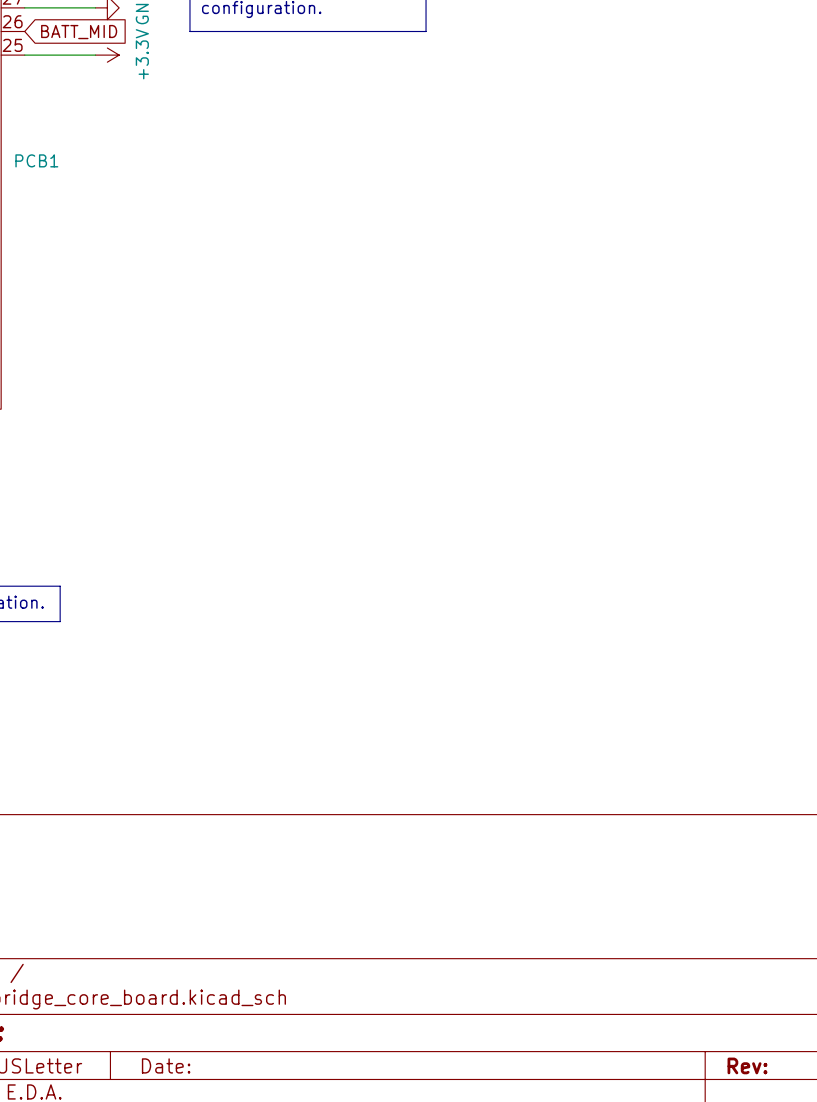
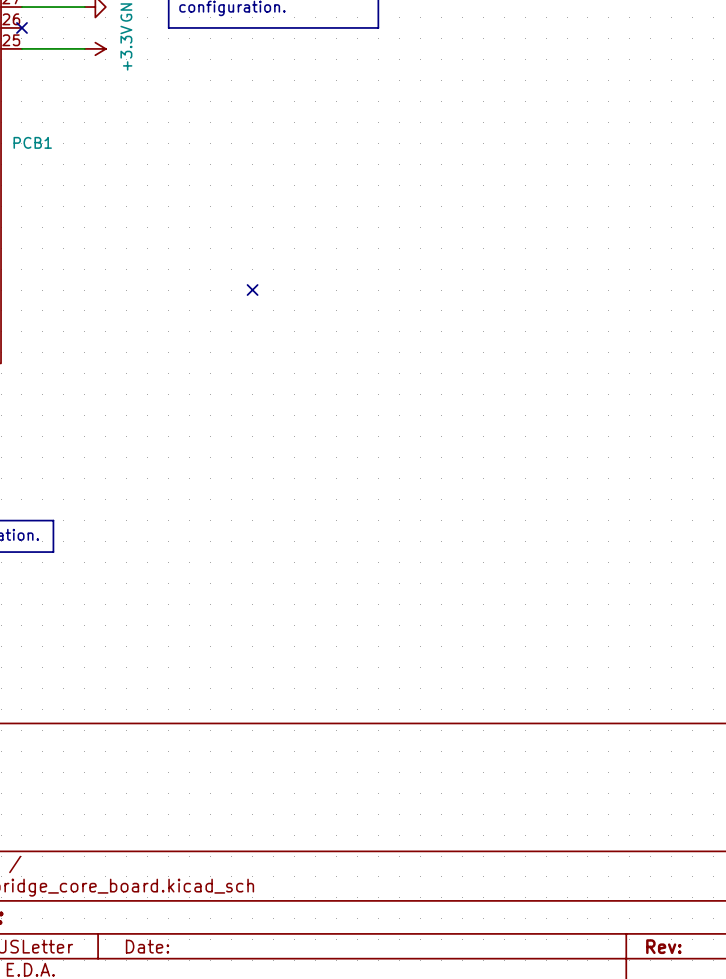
no-connect mark: none -> (21, 27)
global label: BATT_MID (79, 32) -> none
no-connect mark: none -> (252, 290)

